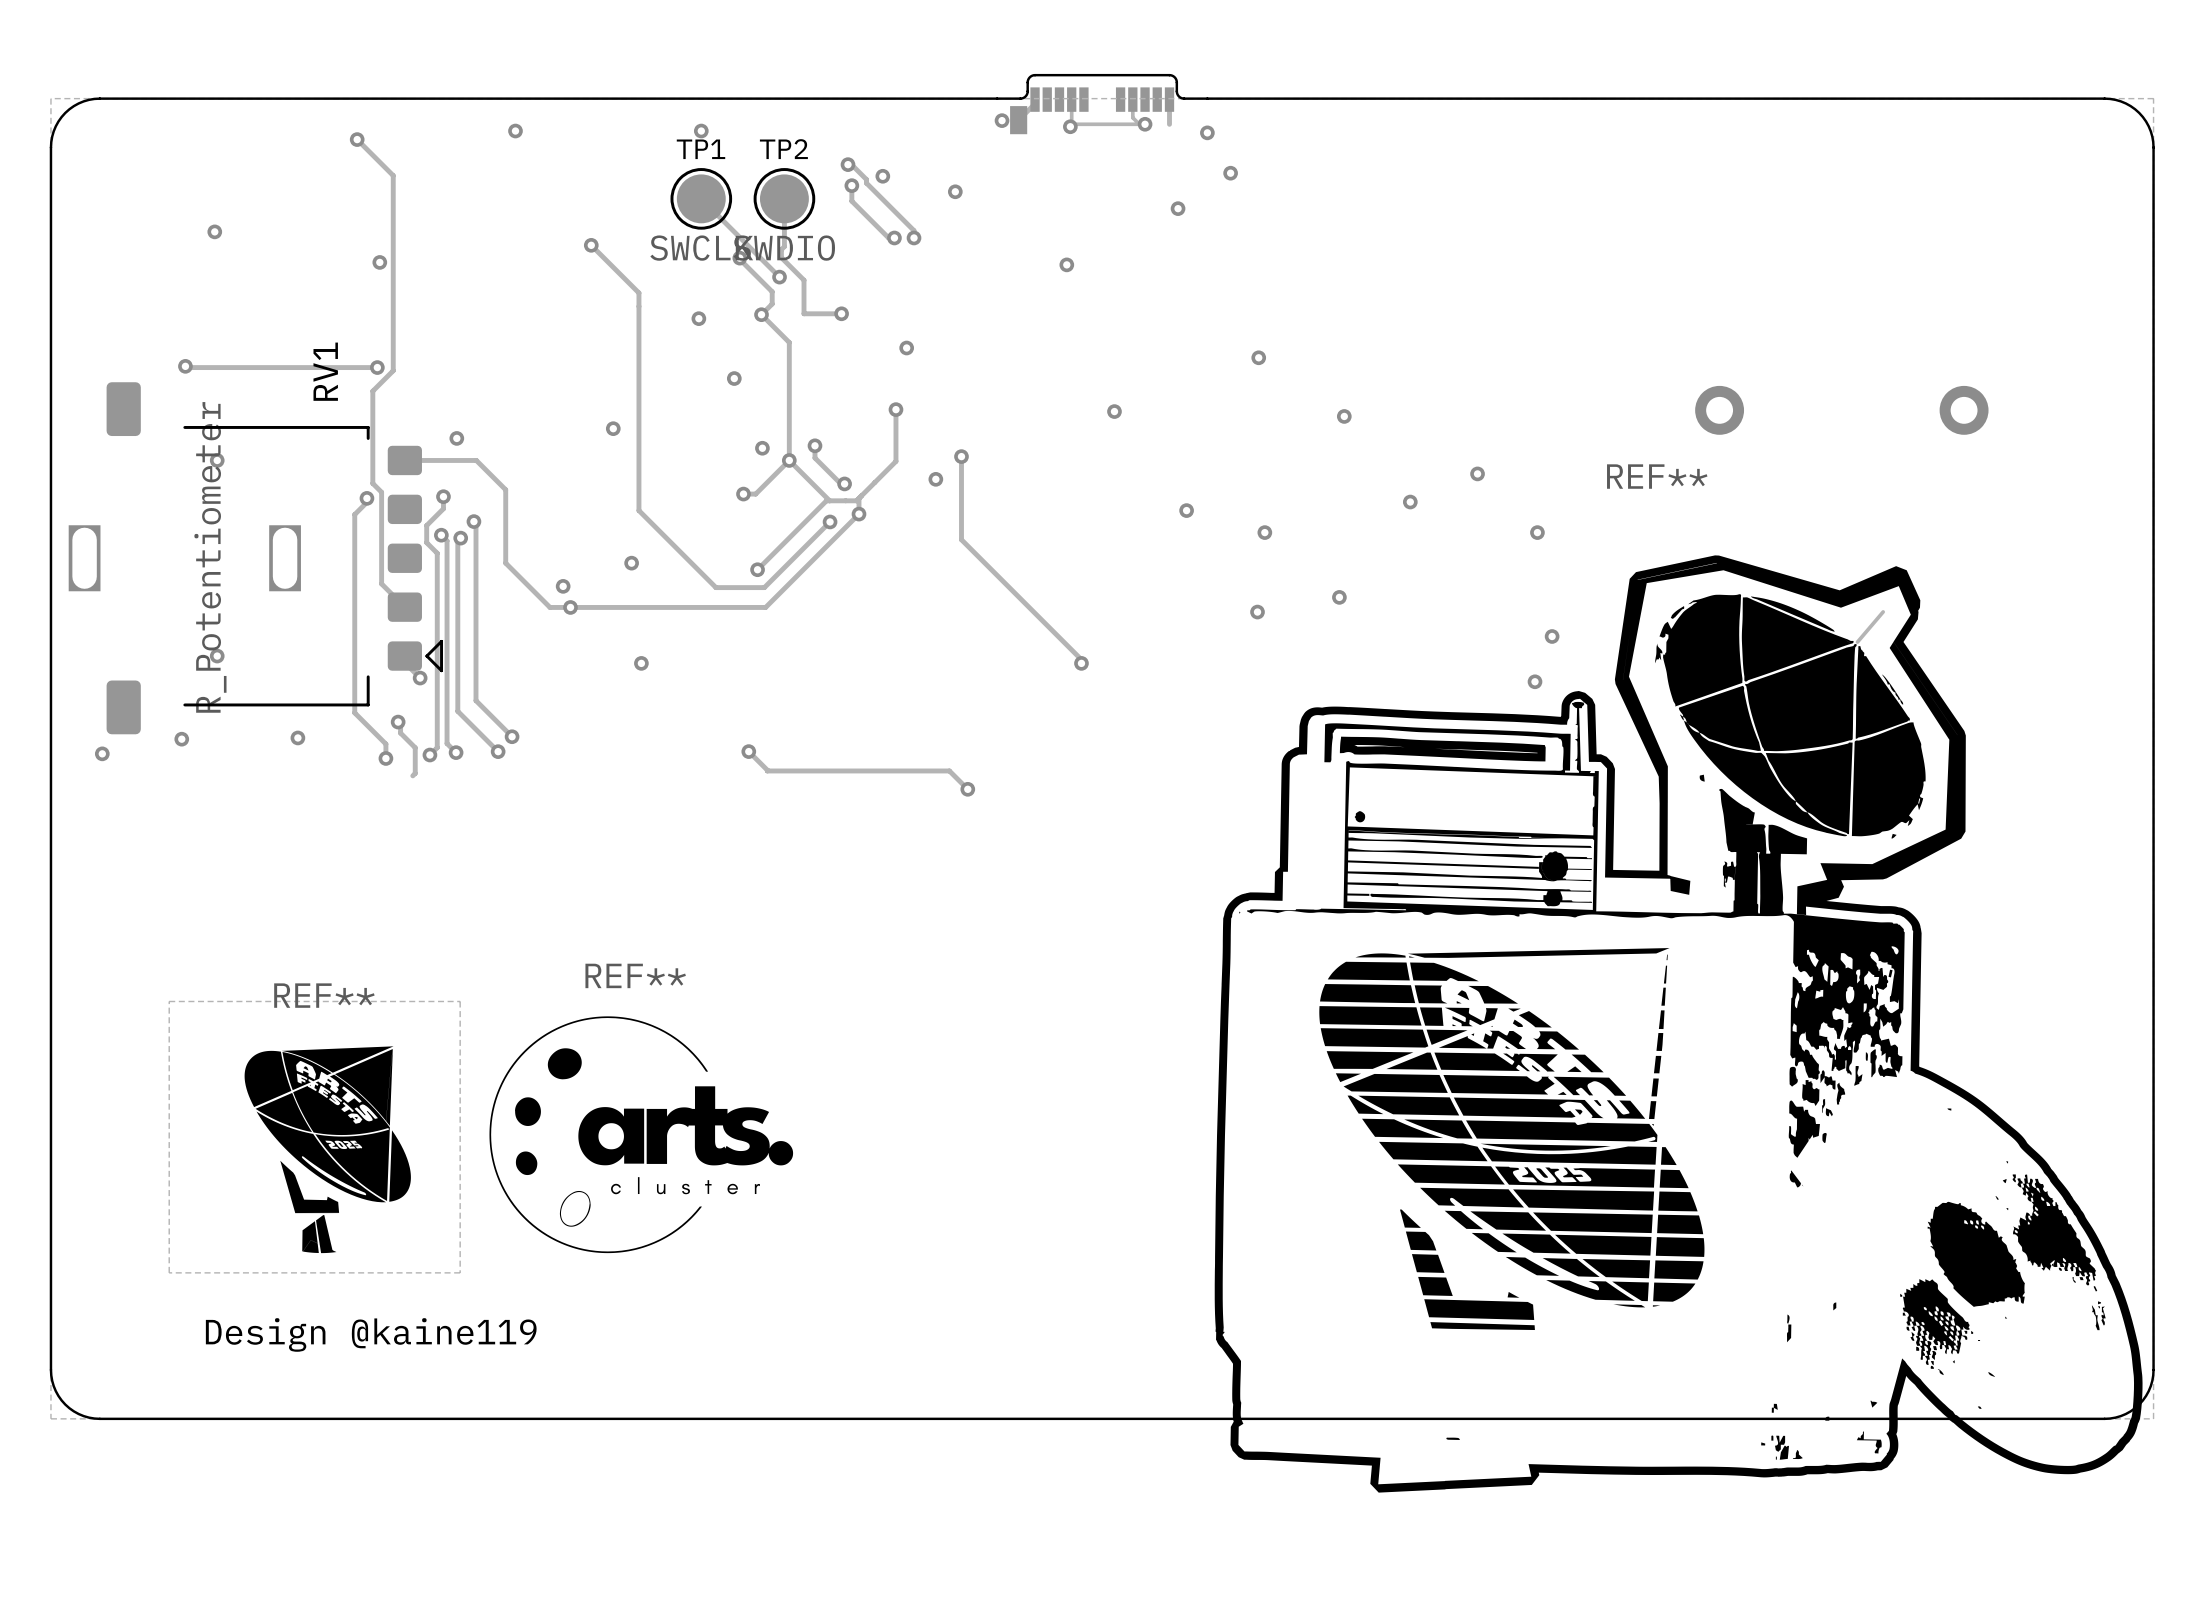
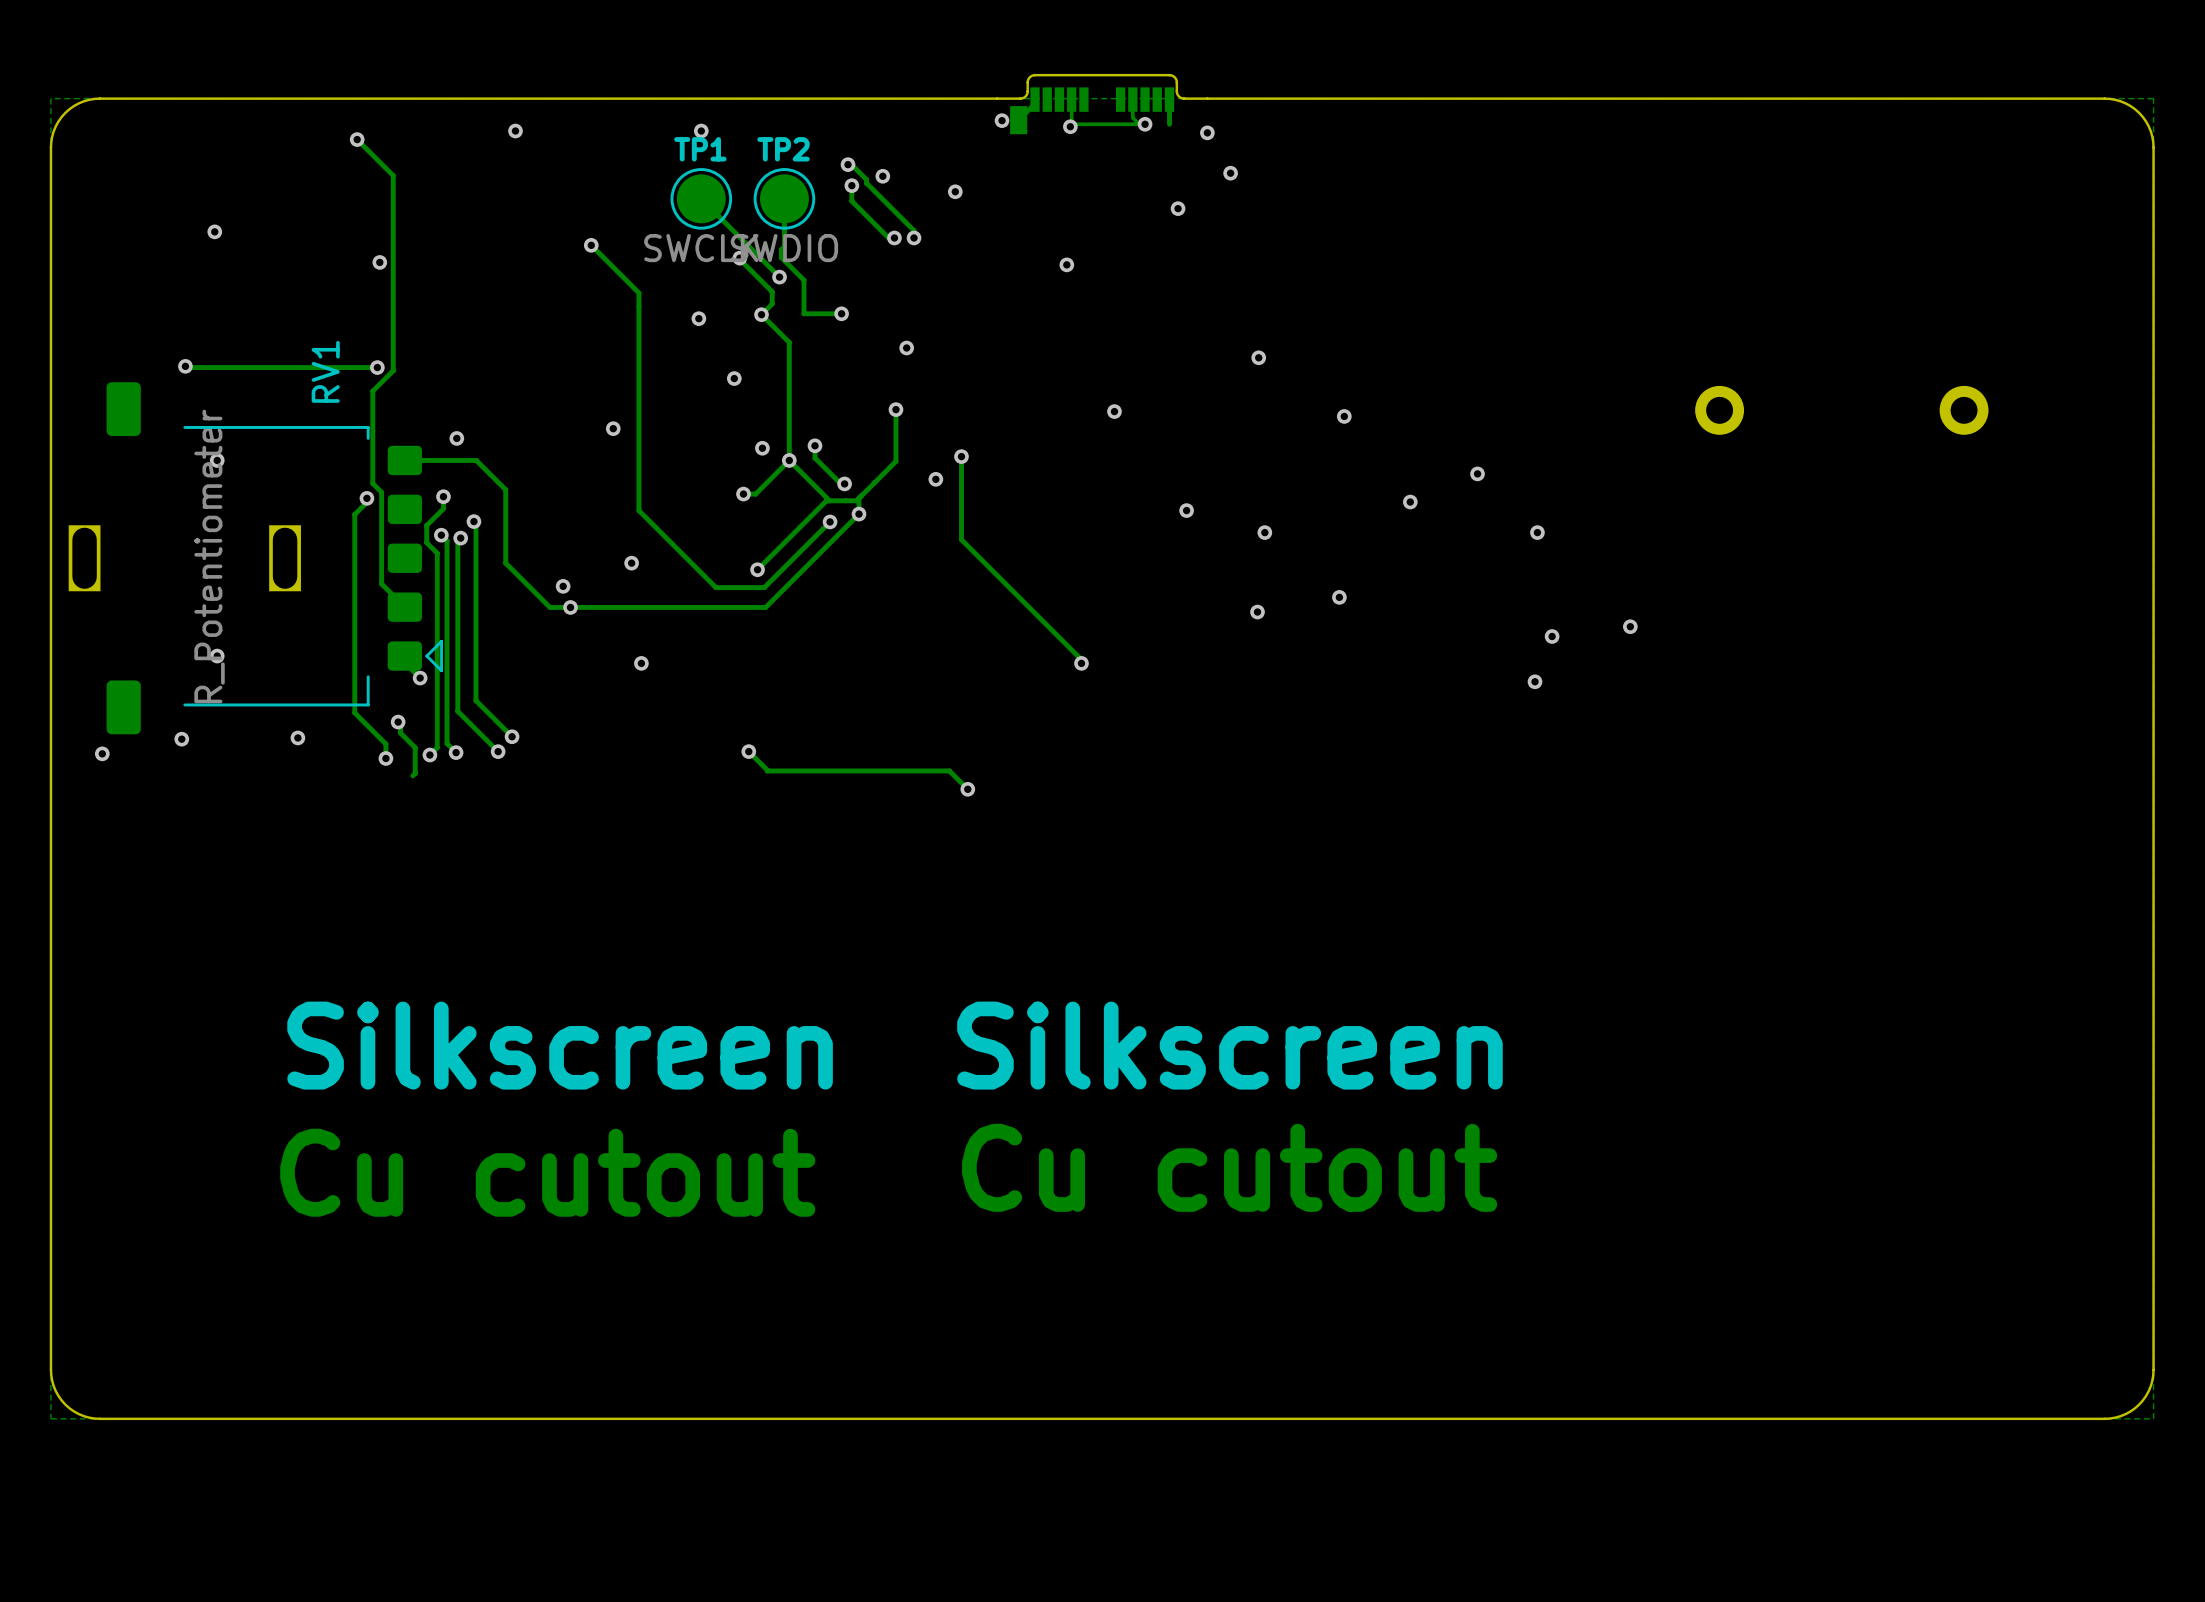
zone outline: (460, 1001) (169, 1001) (169, 1272) (460, 1272) (460, 1001) -> none
REF**: (1678, 1024) -> none
text: none -> Silkscreen (560, 1045)
text: none -> Silkscreen (1229, 1045)
REF**: (641, 1134) -> none
REF**: (327, 1149) -> none
text: none -> Cu cutout (1229, 1167)
text: none -> Cu cutout (547, 1172)
text: Design @kaine119 (371, 1334) -> none

